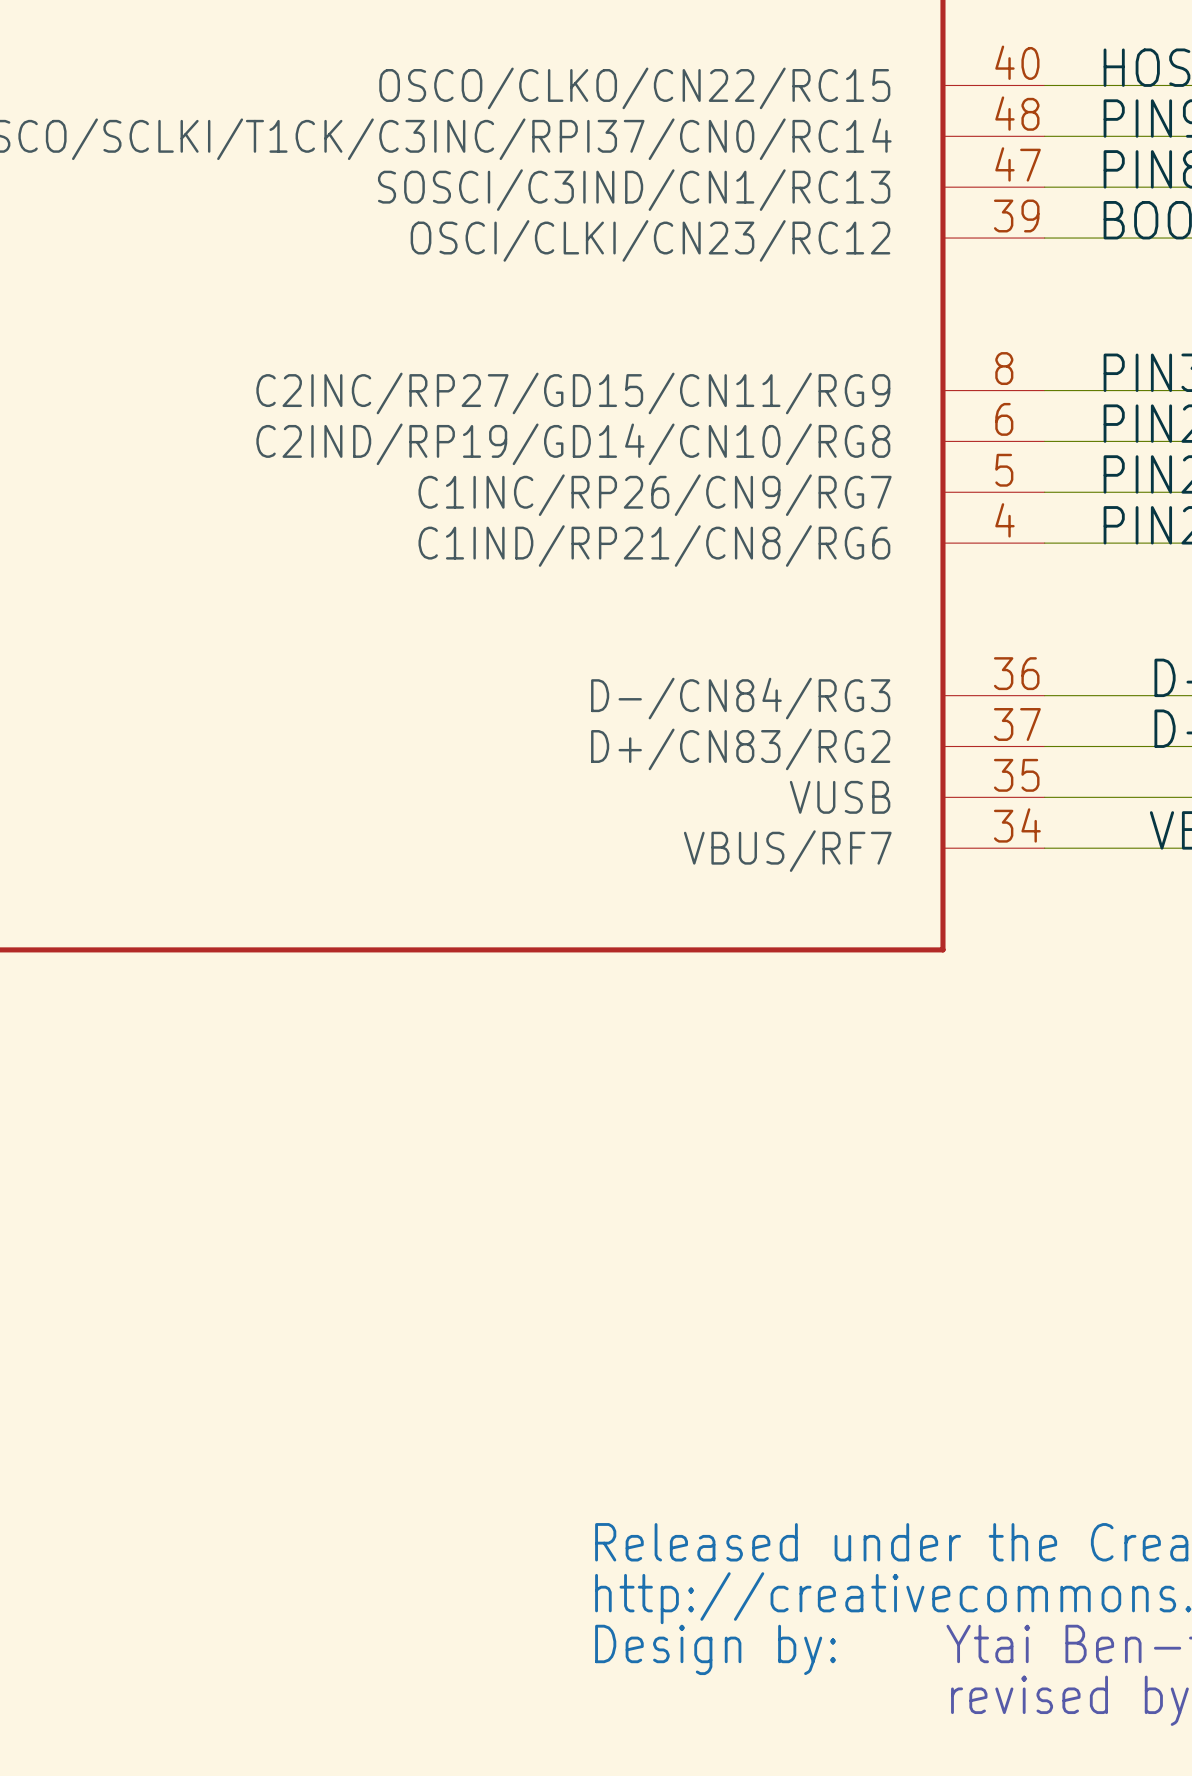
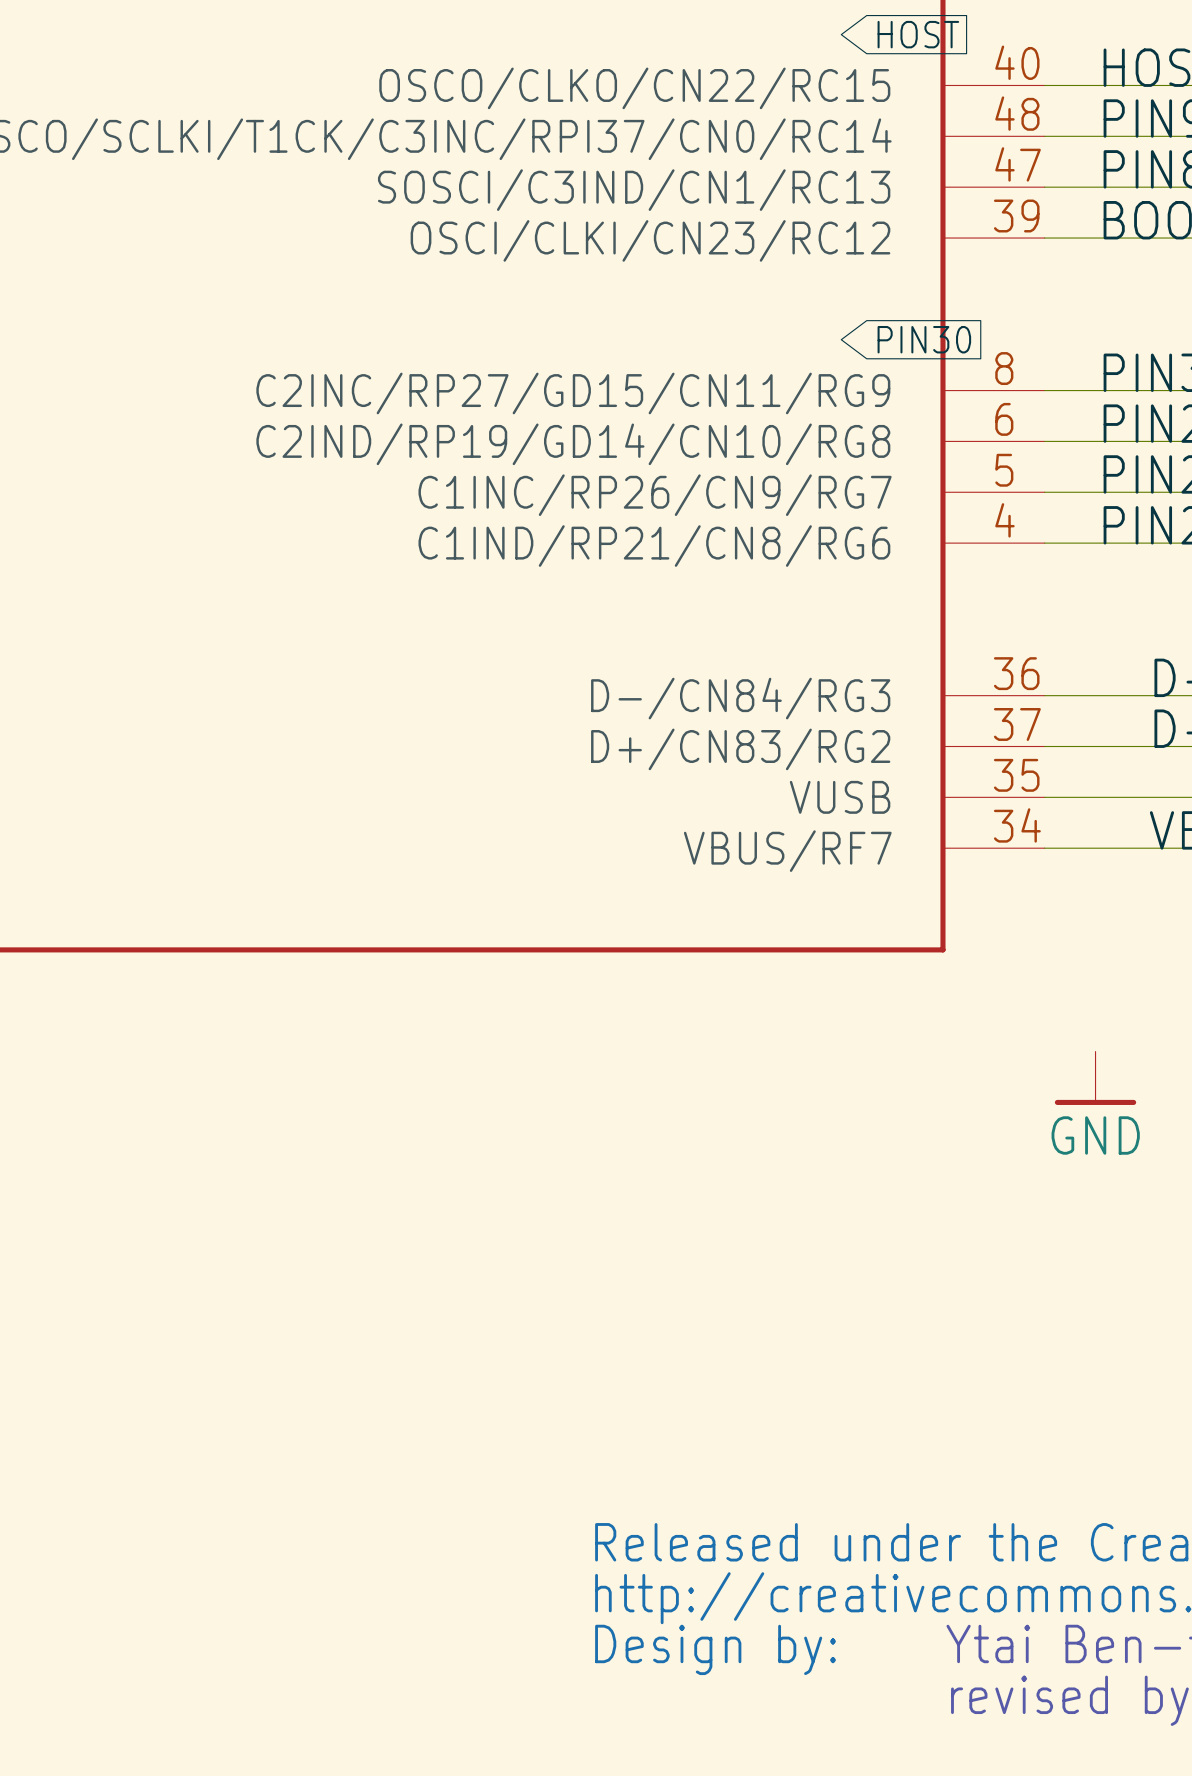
global label: none -> HOST (918, 34)
global label: none -> PIN30 (924, 339)
power symbol: none -> GND (1095, 1078)

